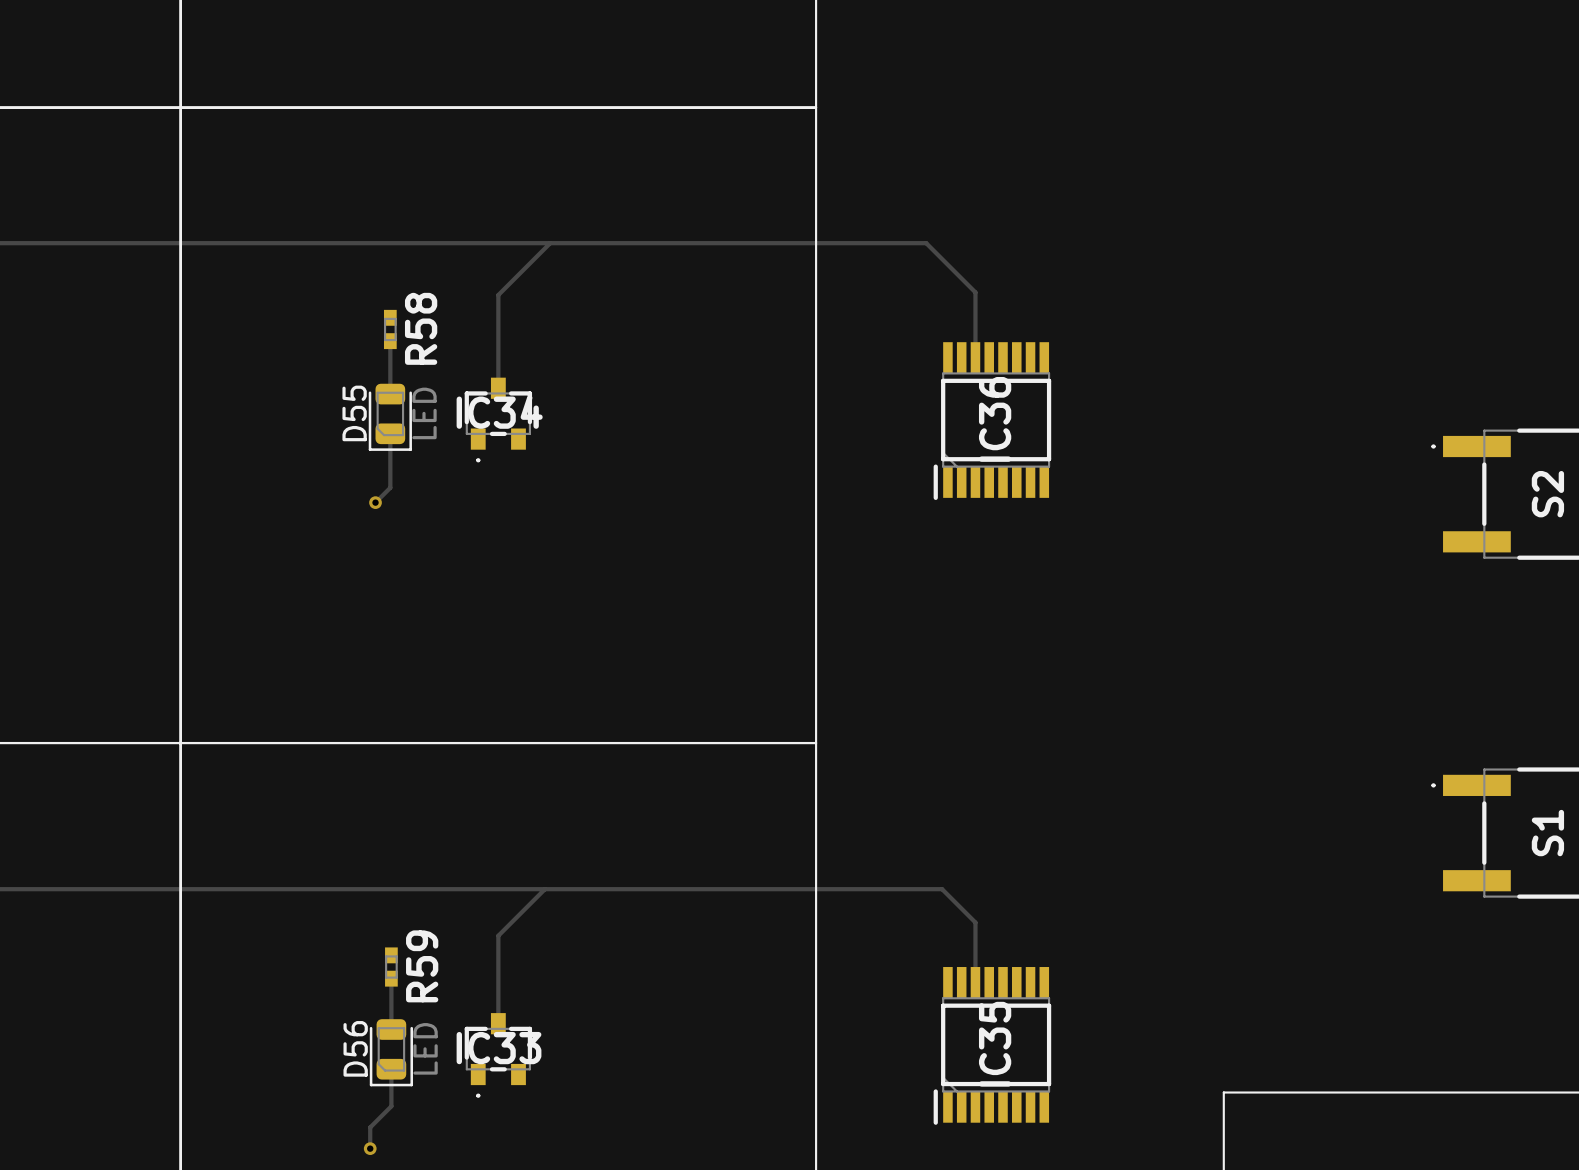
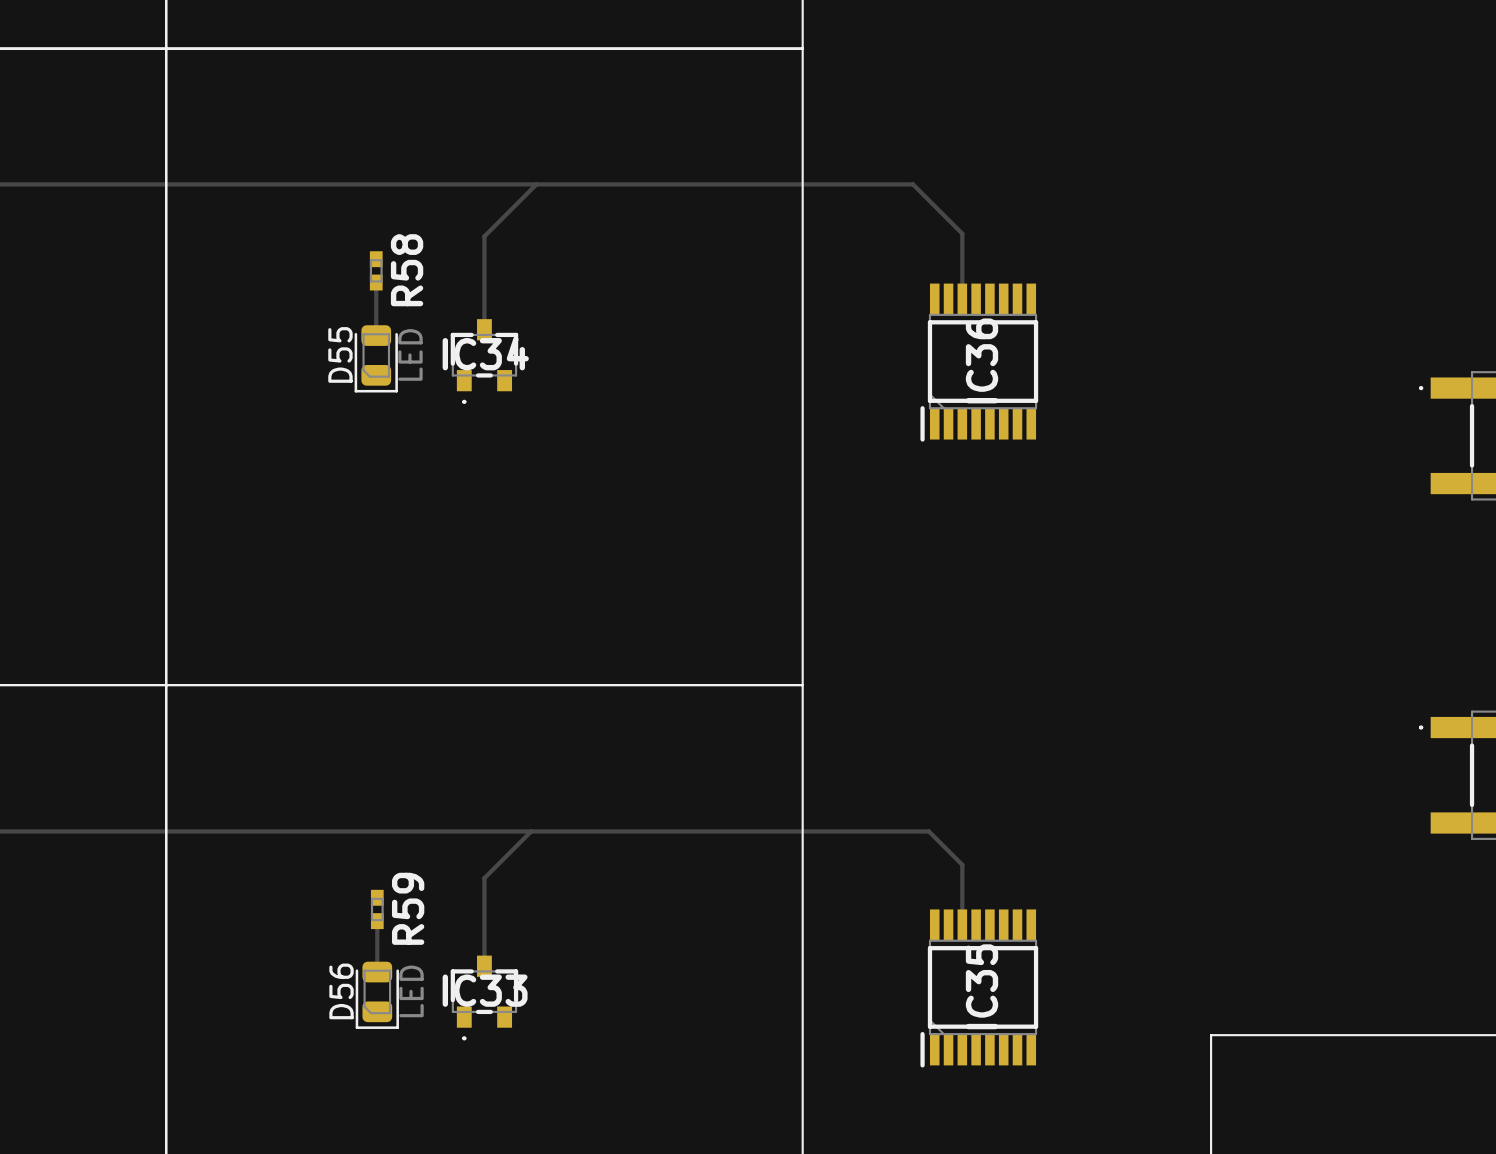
track: (390, 433) (390, 487) (375, 502) -> none
via: (375, 502) -> none
track: (391, 1069) (391, 1106) (370, 1127) (370, 1148) -> none
via: (370, 1148) -> none

